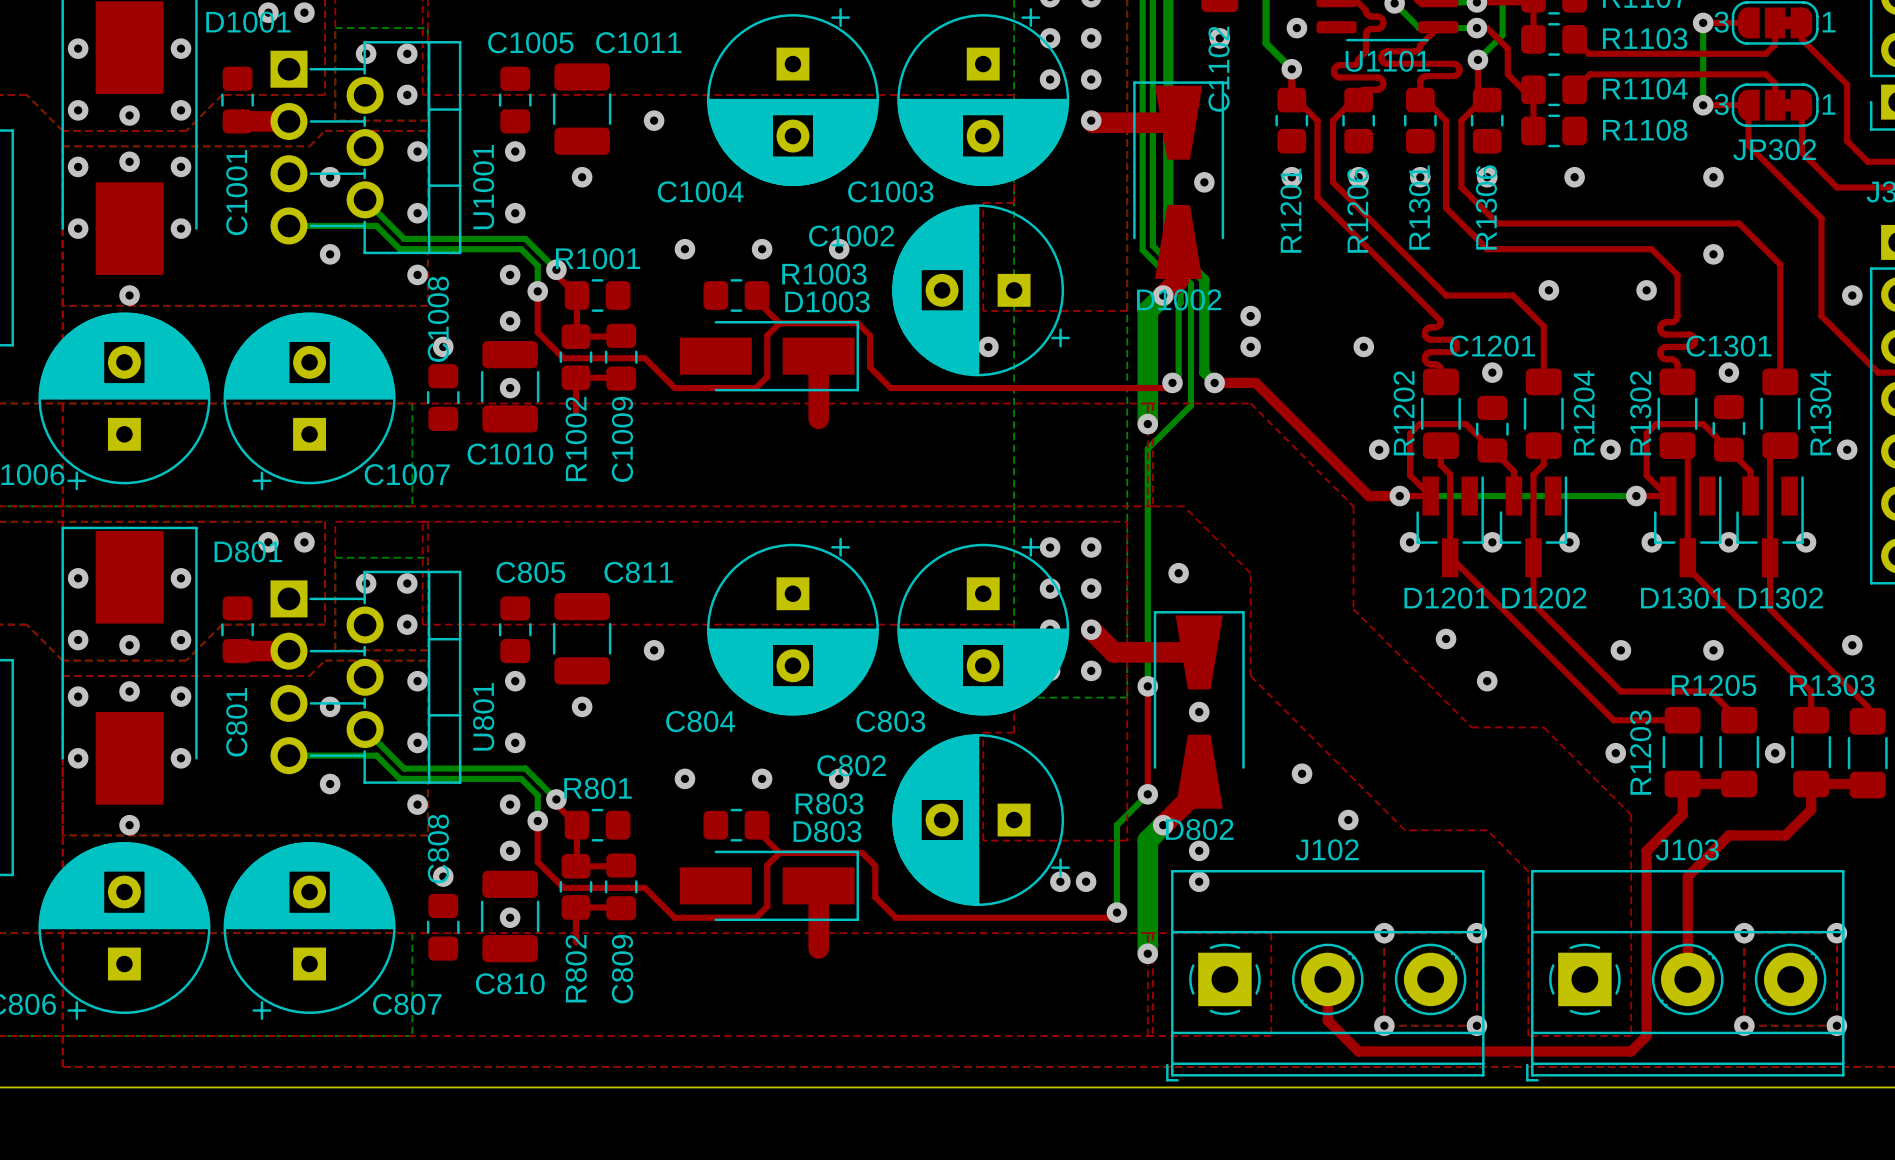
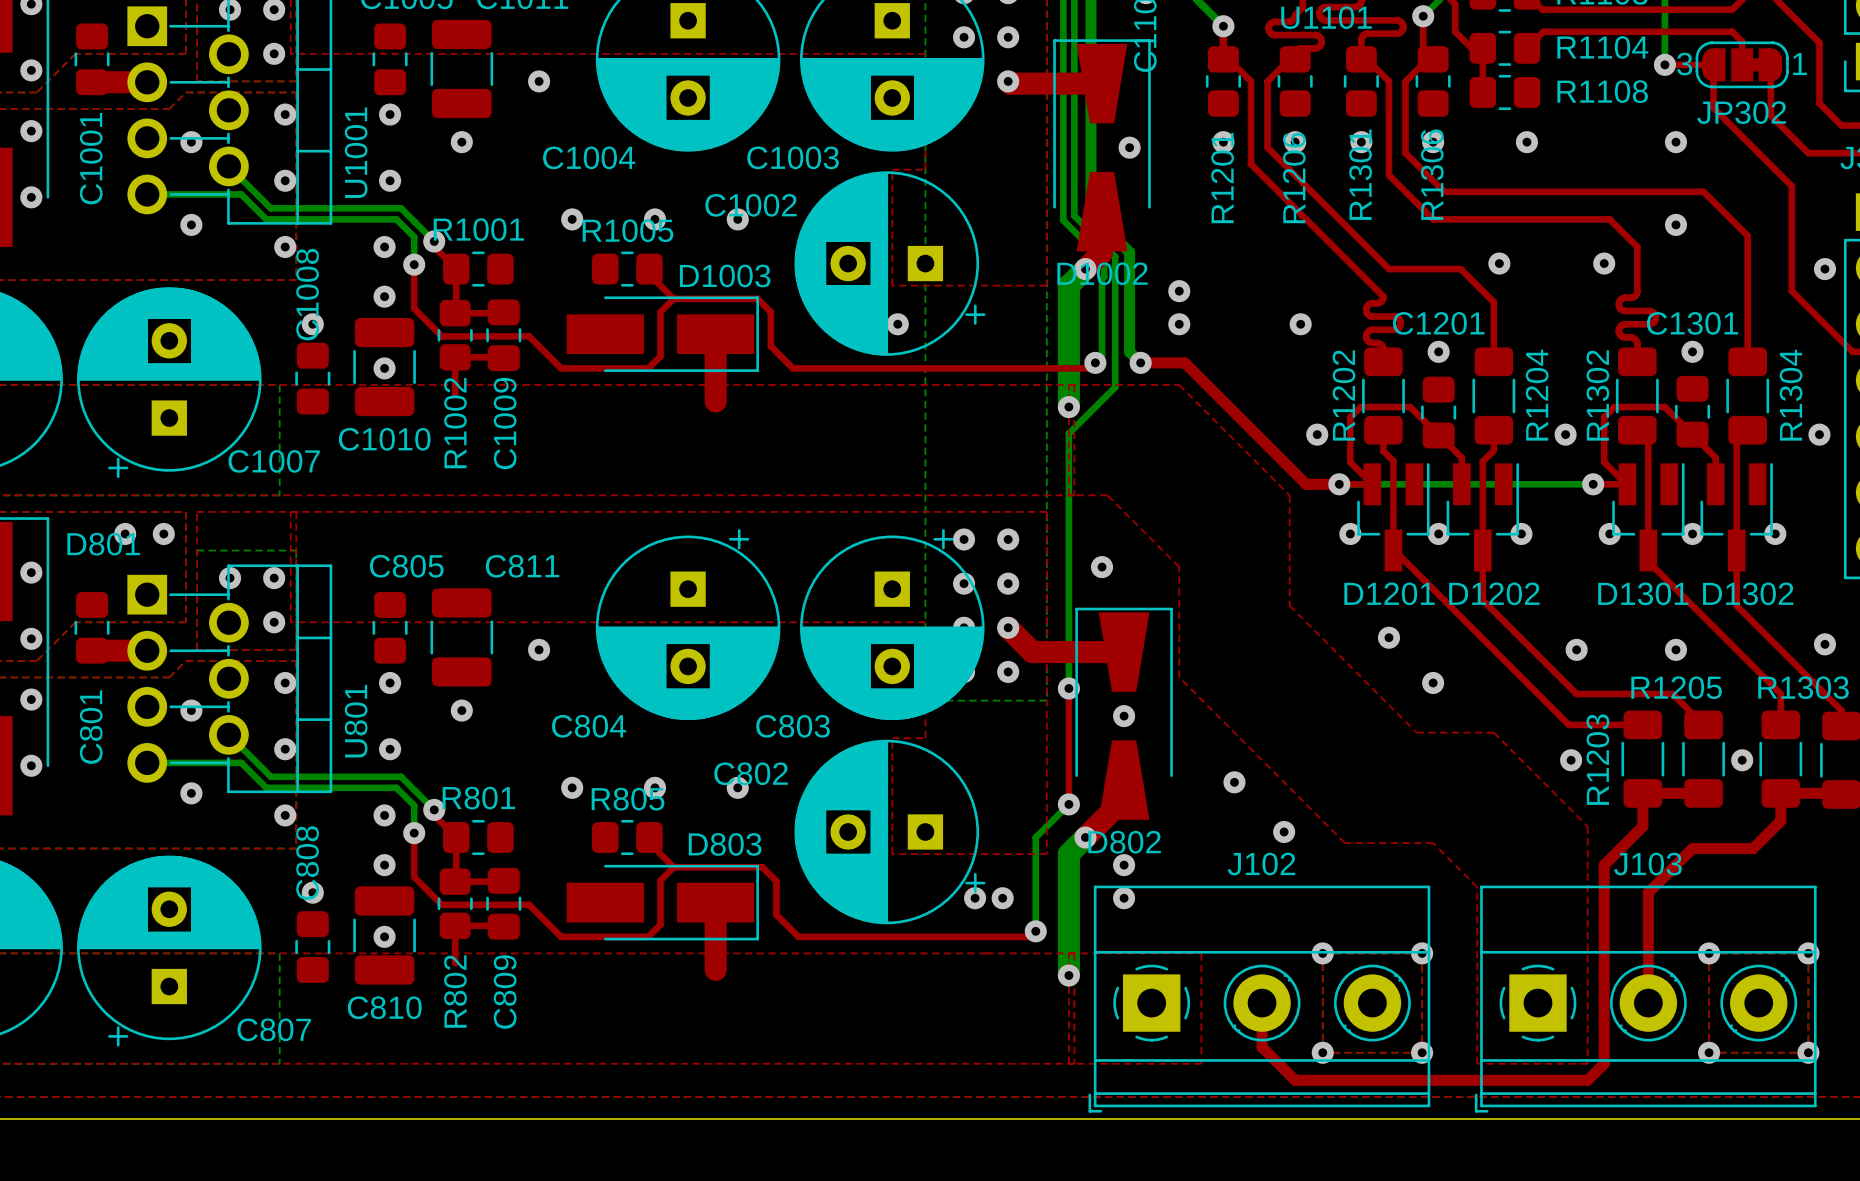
R1003 name: R1003 (824, 274) -> R1005 (628, 230)
R803 name: R803 (829, 803) -> R805 (628, 799)

